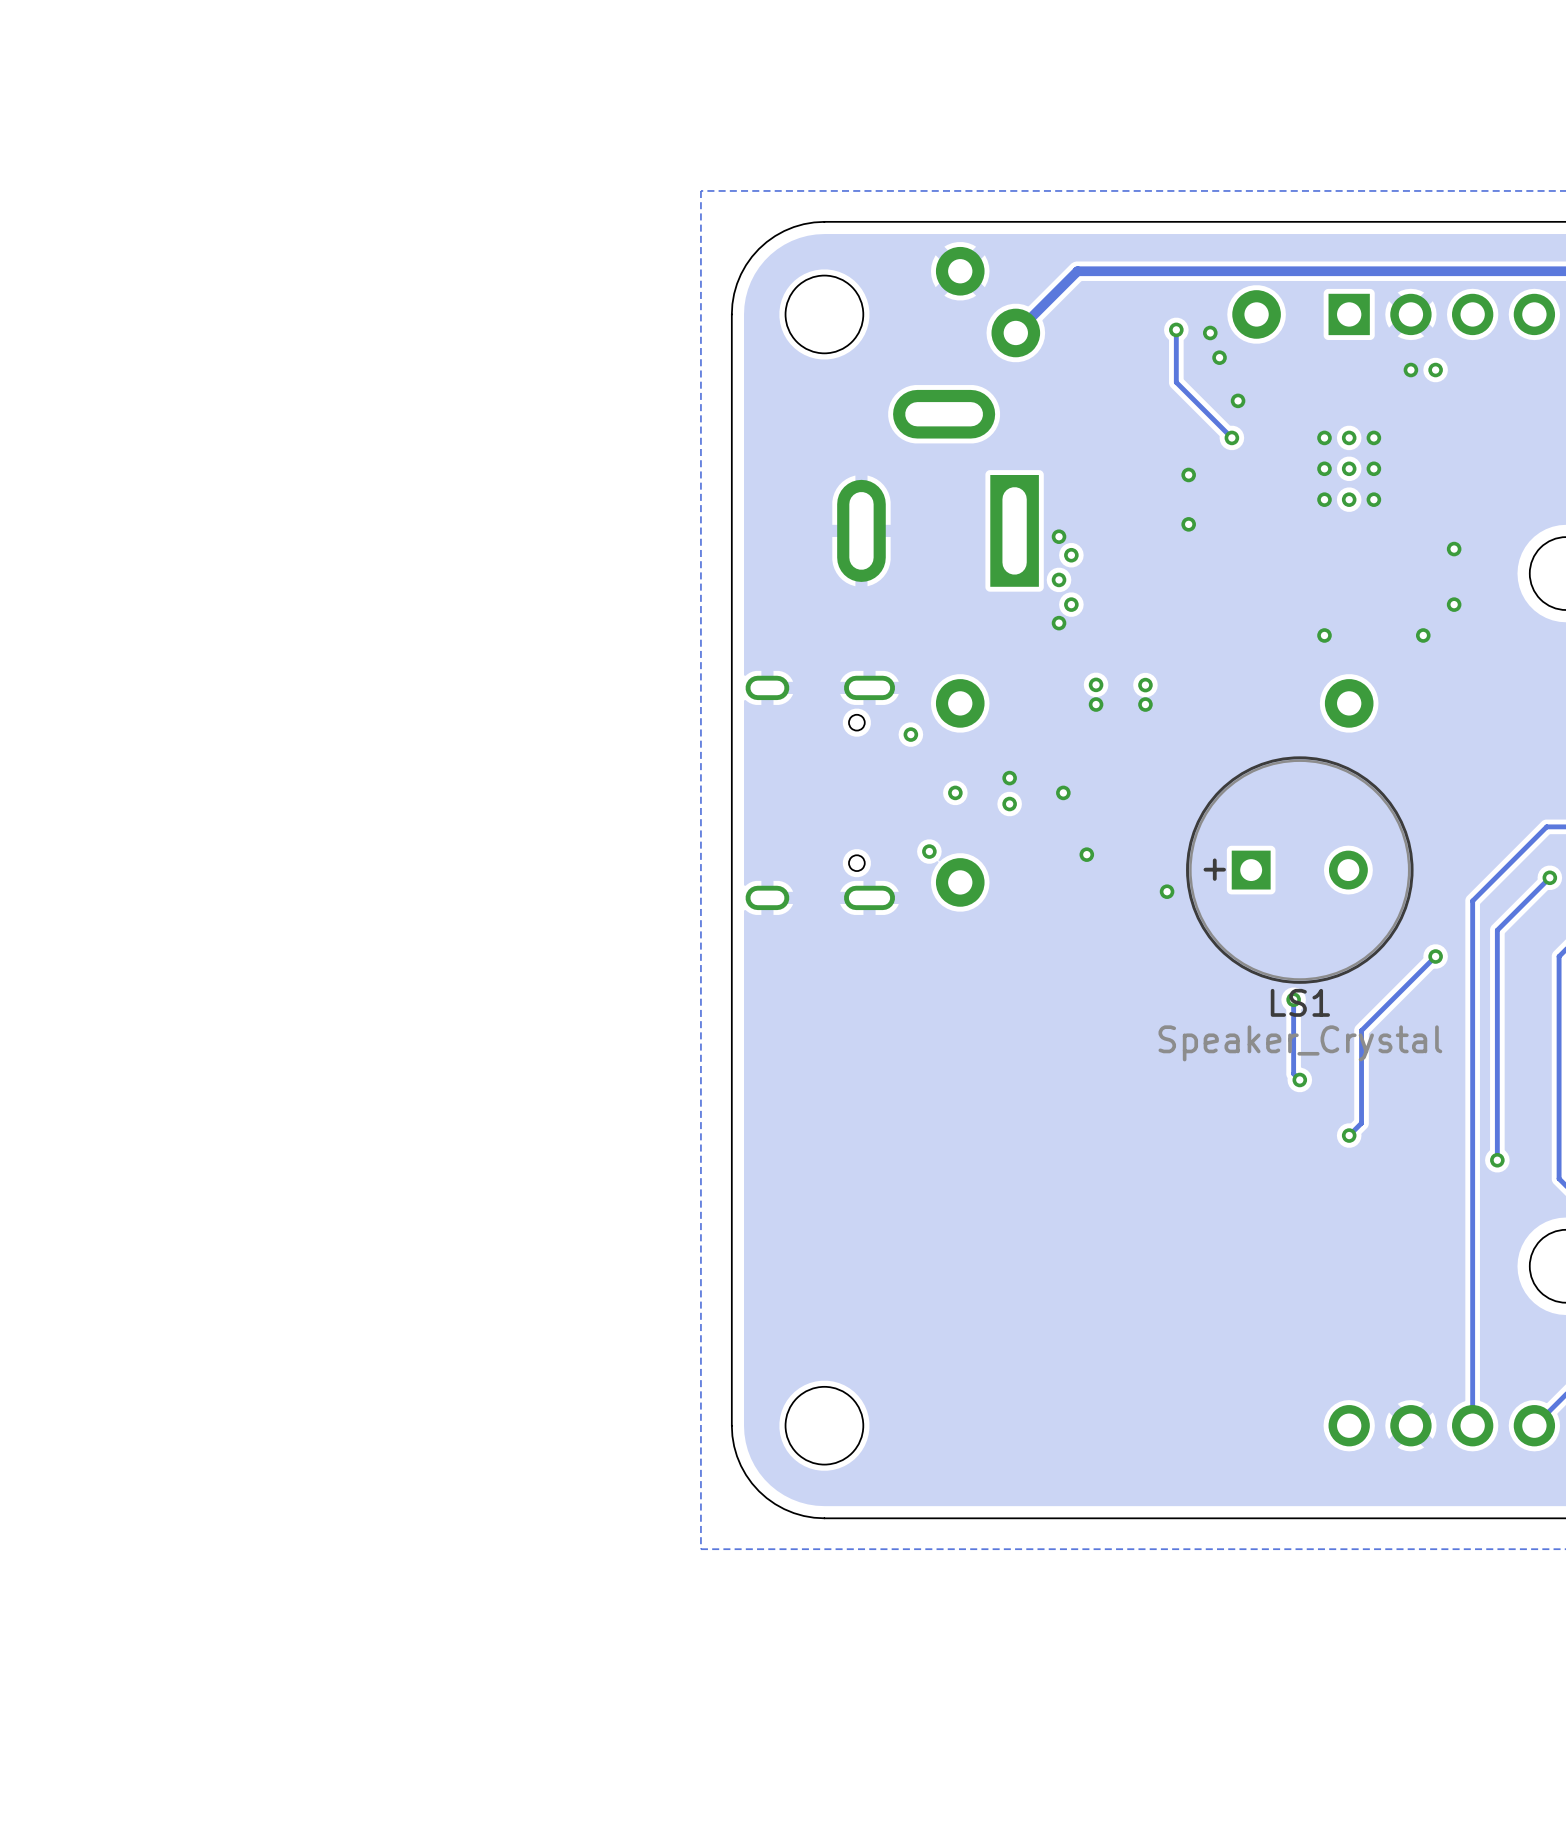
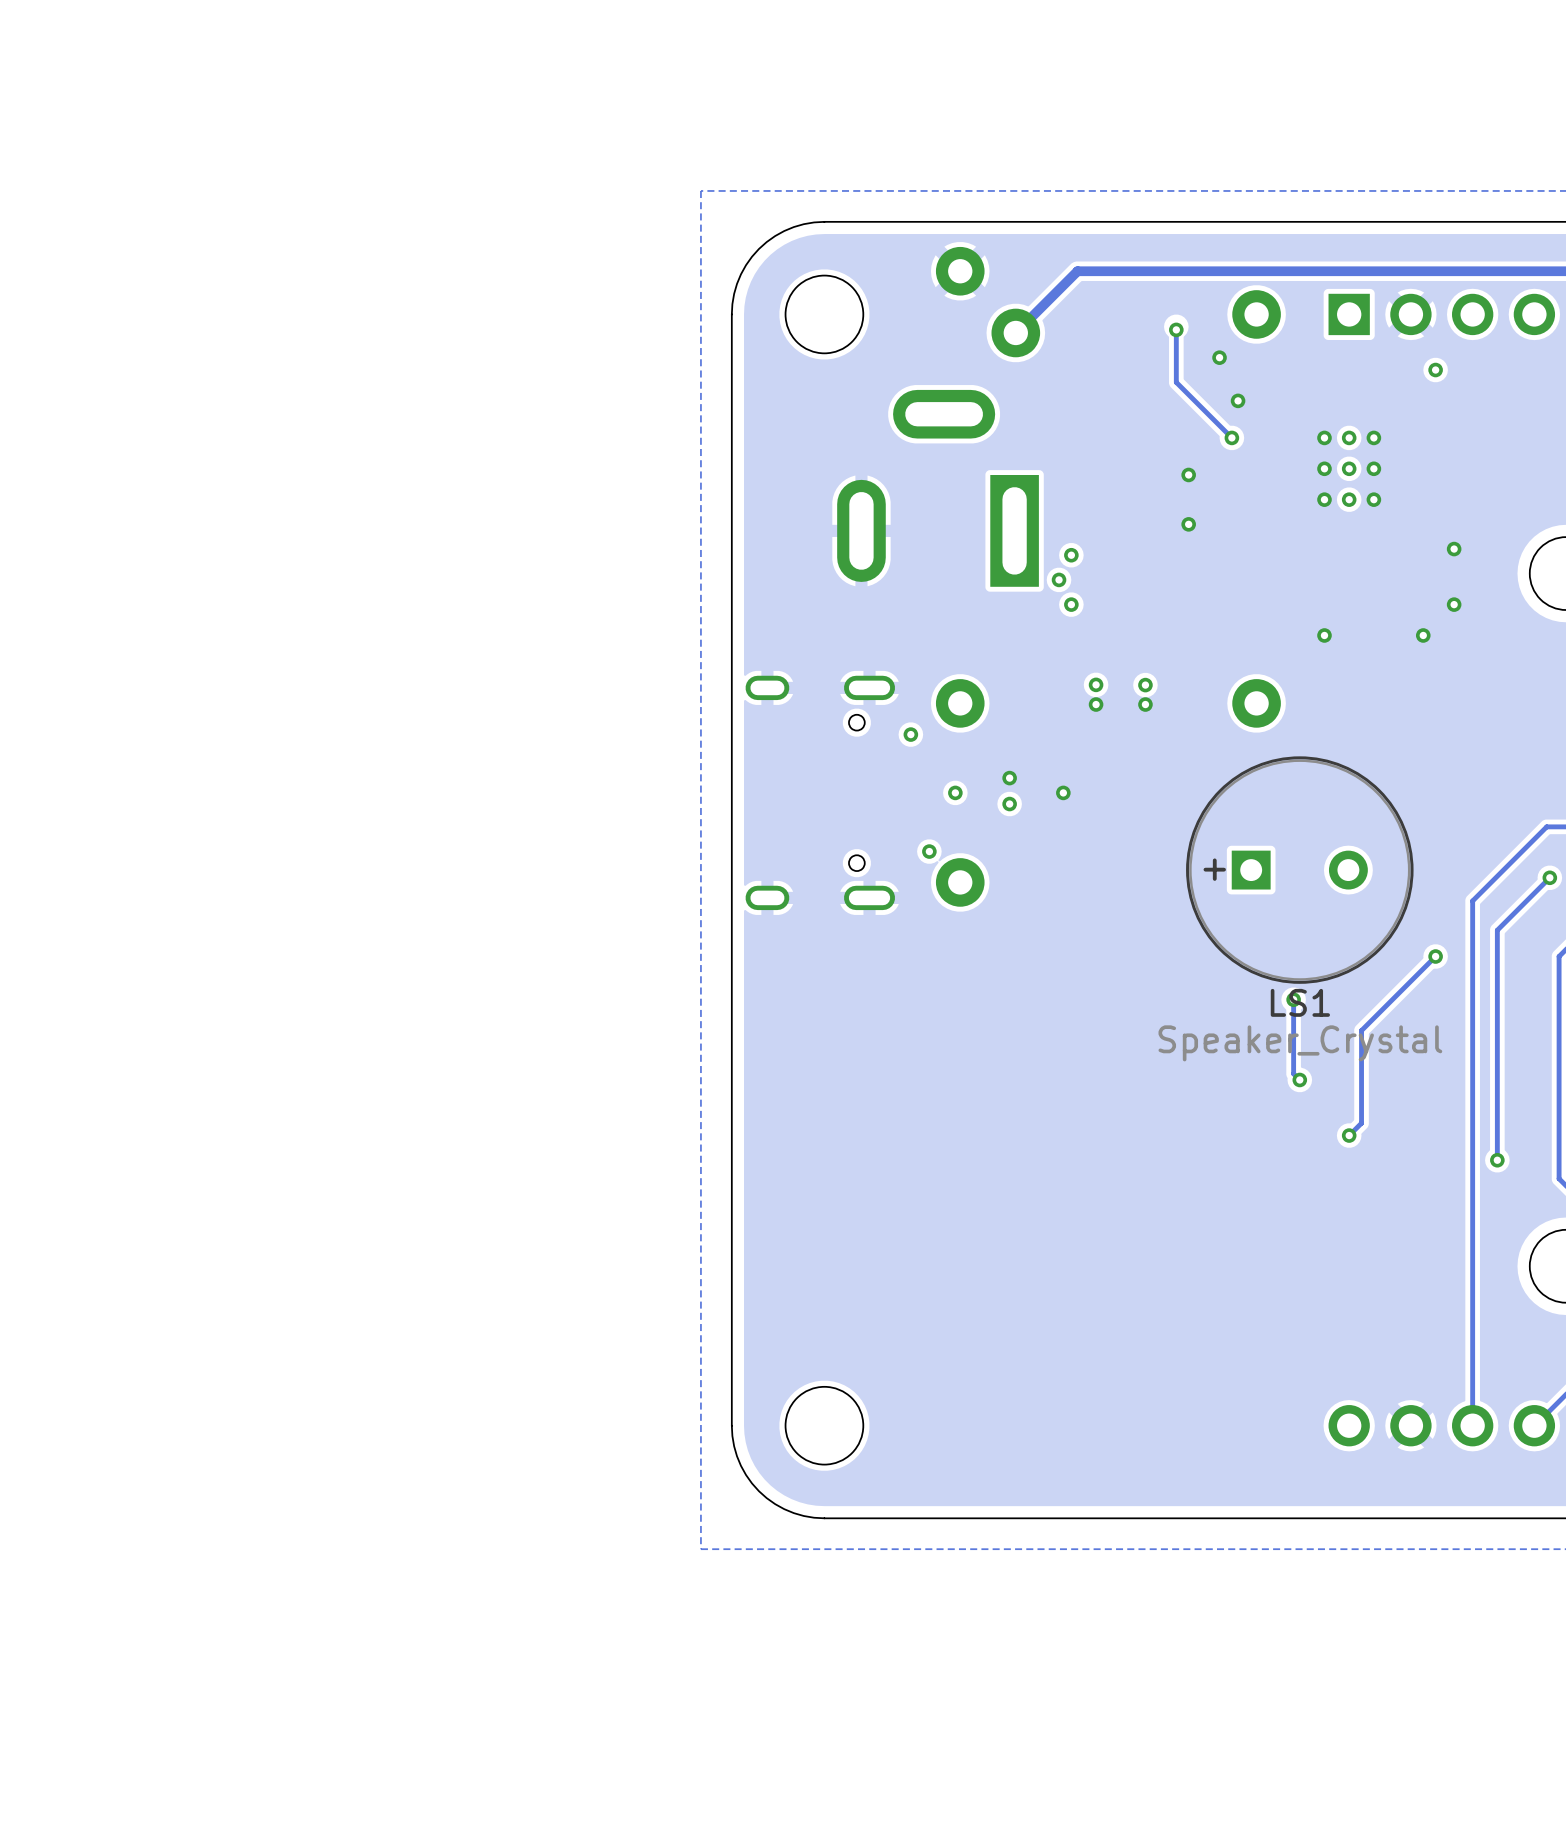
via: (1210, 332) -> none
via: (1410, 370) -> none
via: (1059, 536) -> none
via: (1059, 623) -> none
part position: (1349, 703) -> (1256, 703)
via: (1086, 854) -> none
via: (1167, 891) -> none

